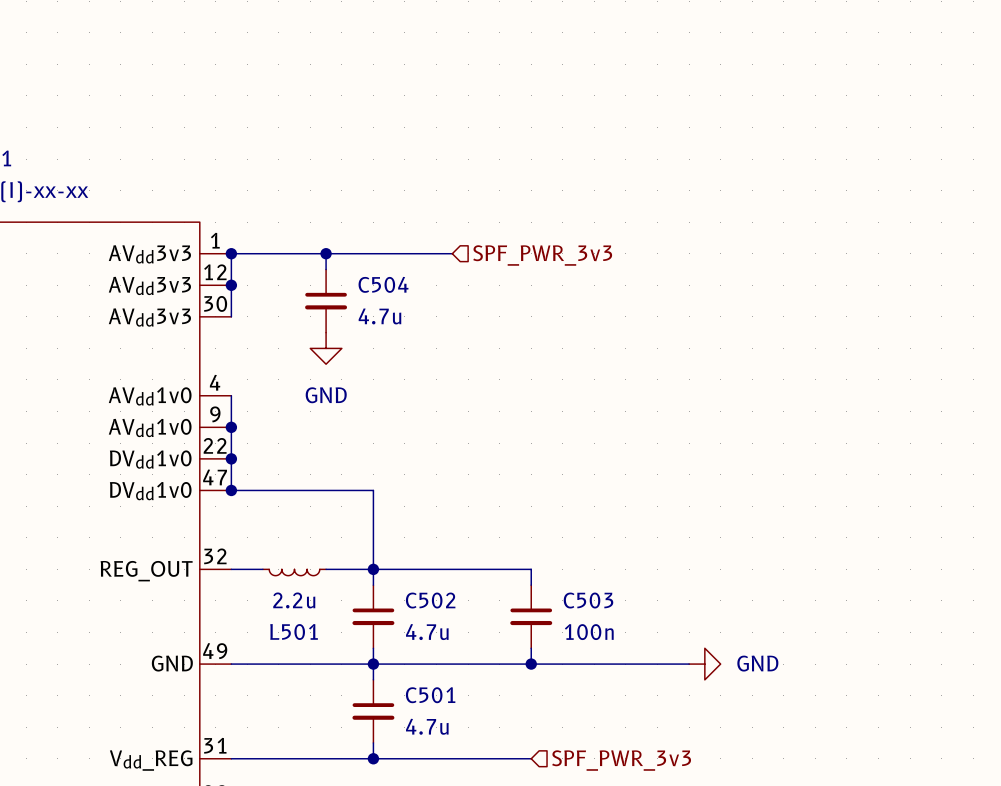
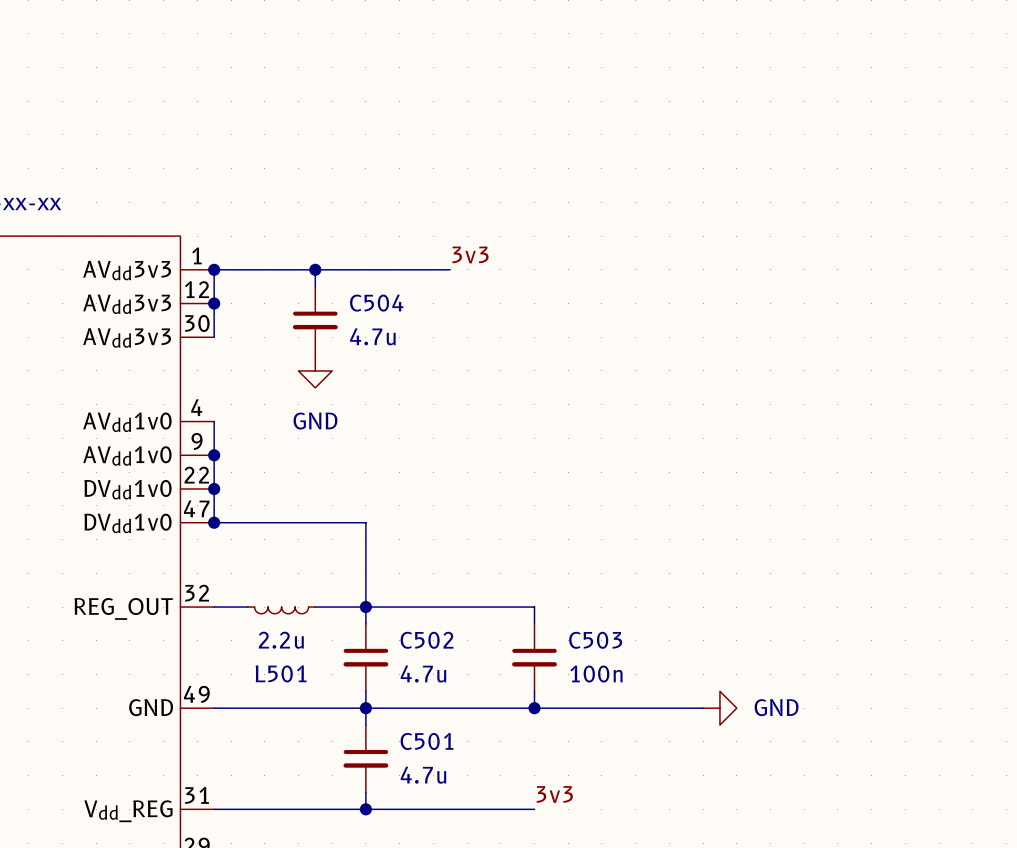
label: none -> 3v3 (470, 255)
hierarchical label: SPF_PWR_3v3 (542, 255) -> none
label: none -> 3v3 (554, 794)
hierarchical label: SPF_PWR_3v3 (621, 760) -> none

